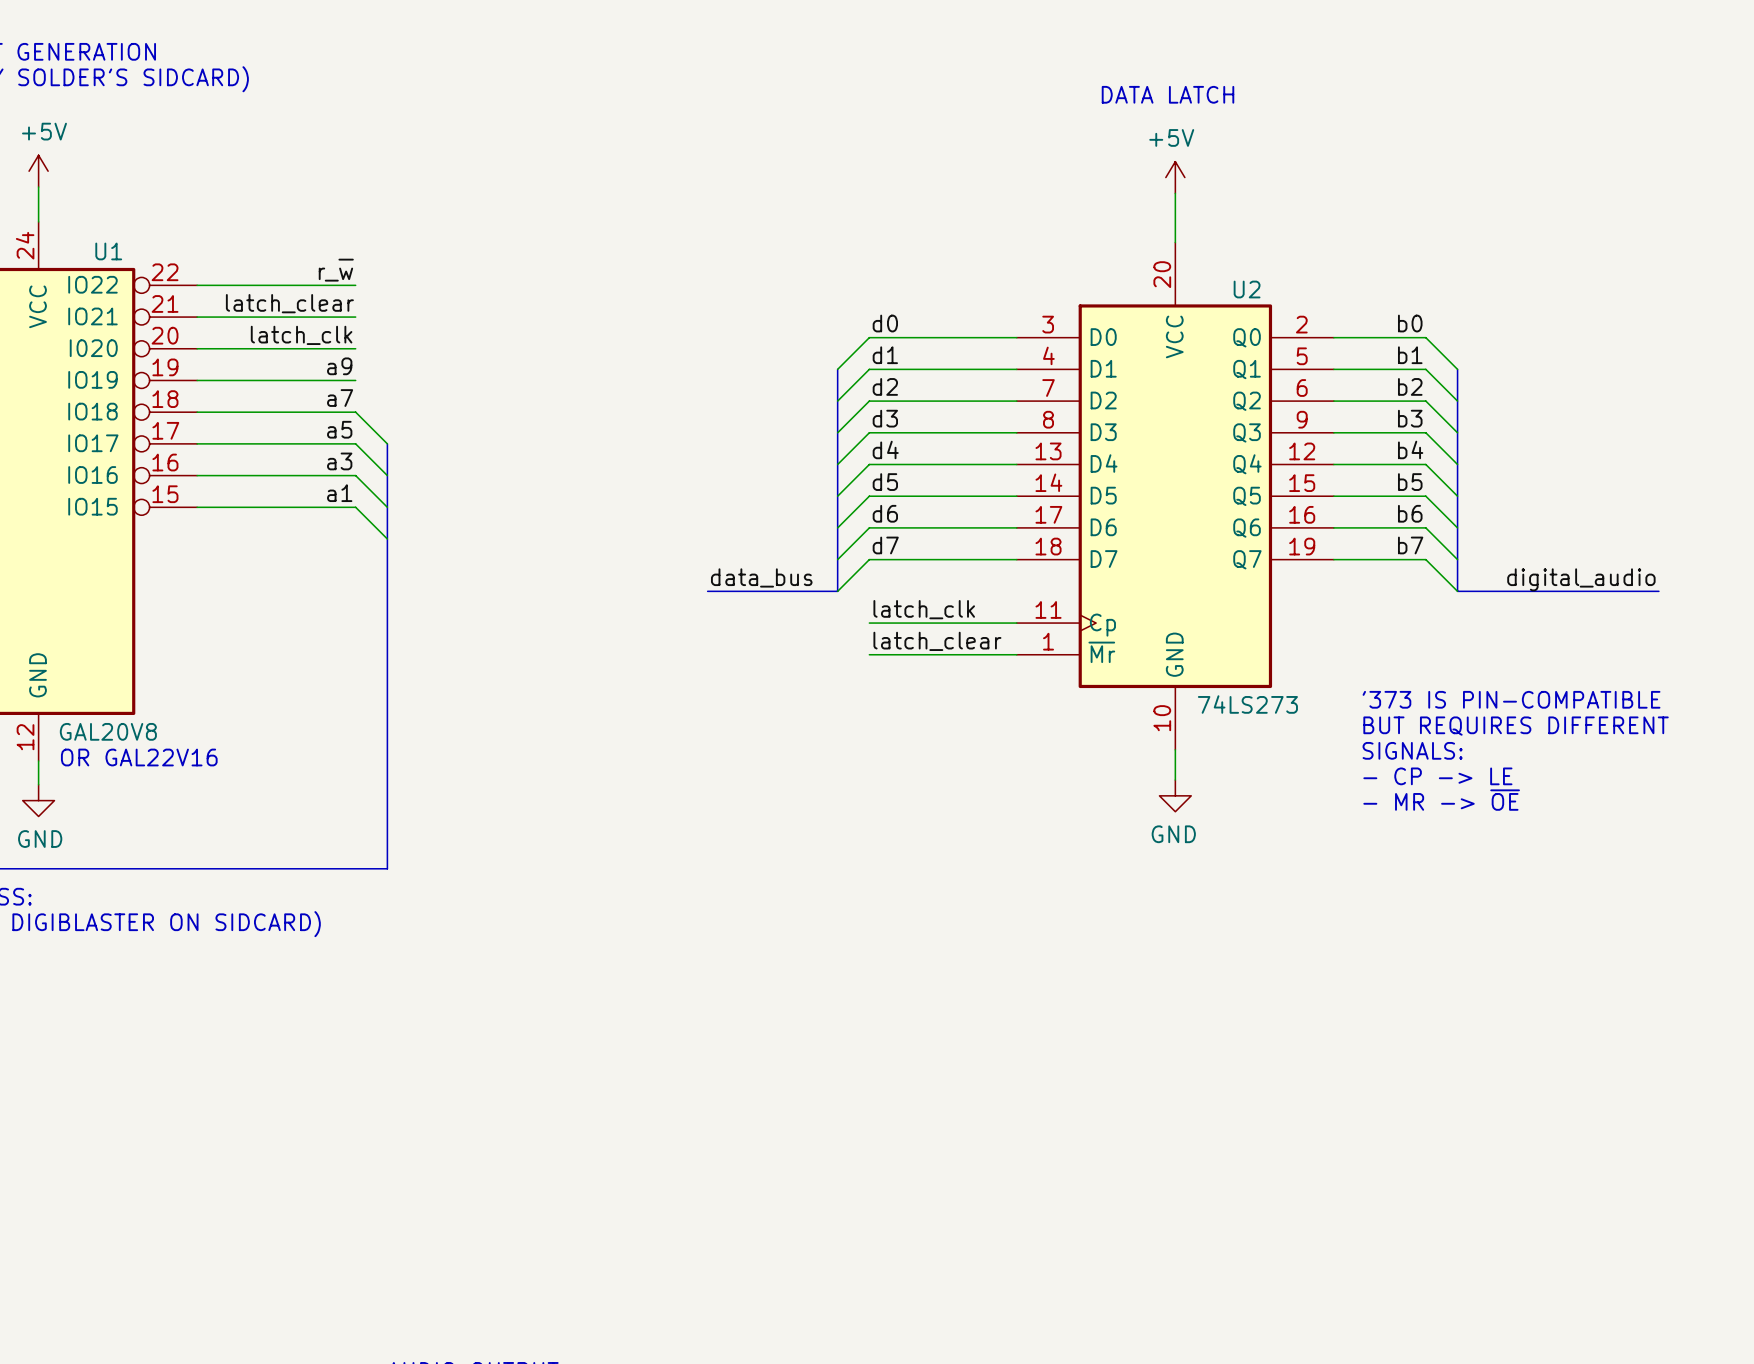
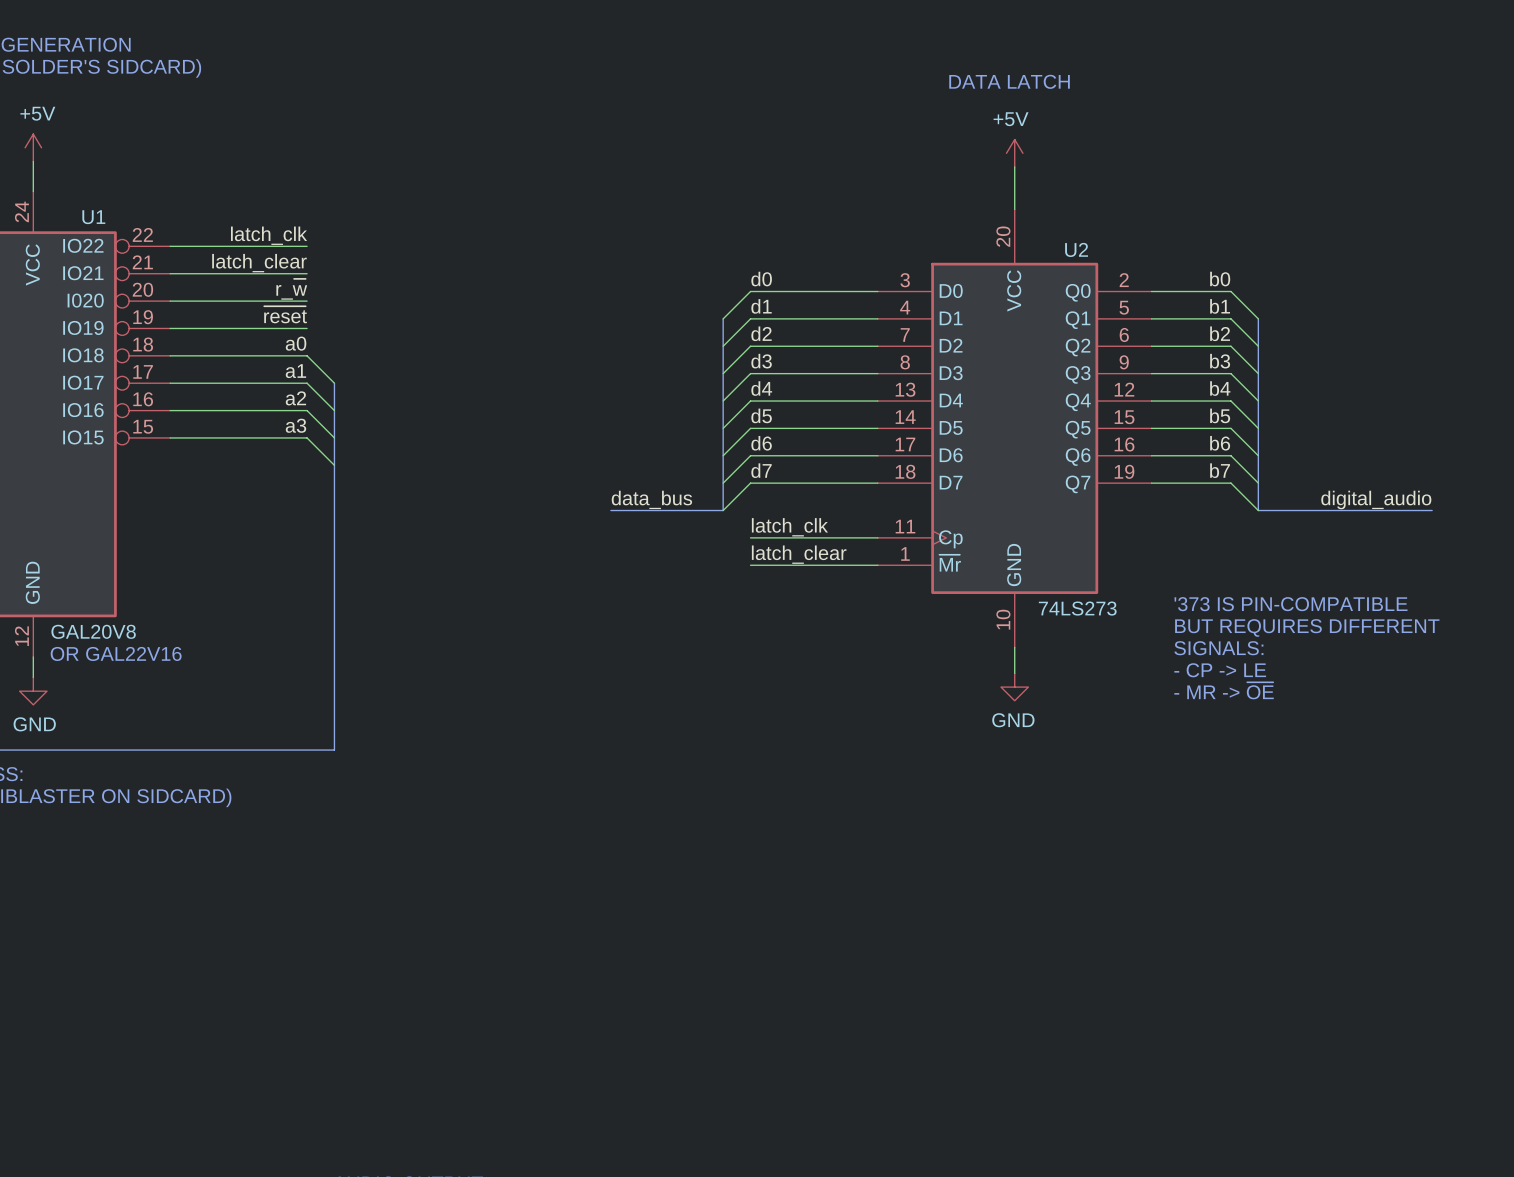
label: r_~{w} (336, 270) -> latch_clk (269, 235)
label: latch_clk (301, 335) -> r_~{w} (291, 289)
label: a9 (339, 366) -> ~{reset} (285, 314)
label: a7 (340, 398) -> a0 (296, 343)
label: a5 (339, 429) -> a1 (295, 371)
label: a3 (339, 461) -> a2 (295, 398)
label: a1 (339, 493) -> a3 (295, 425)

